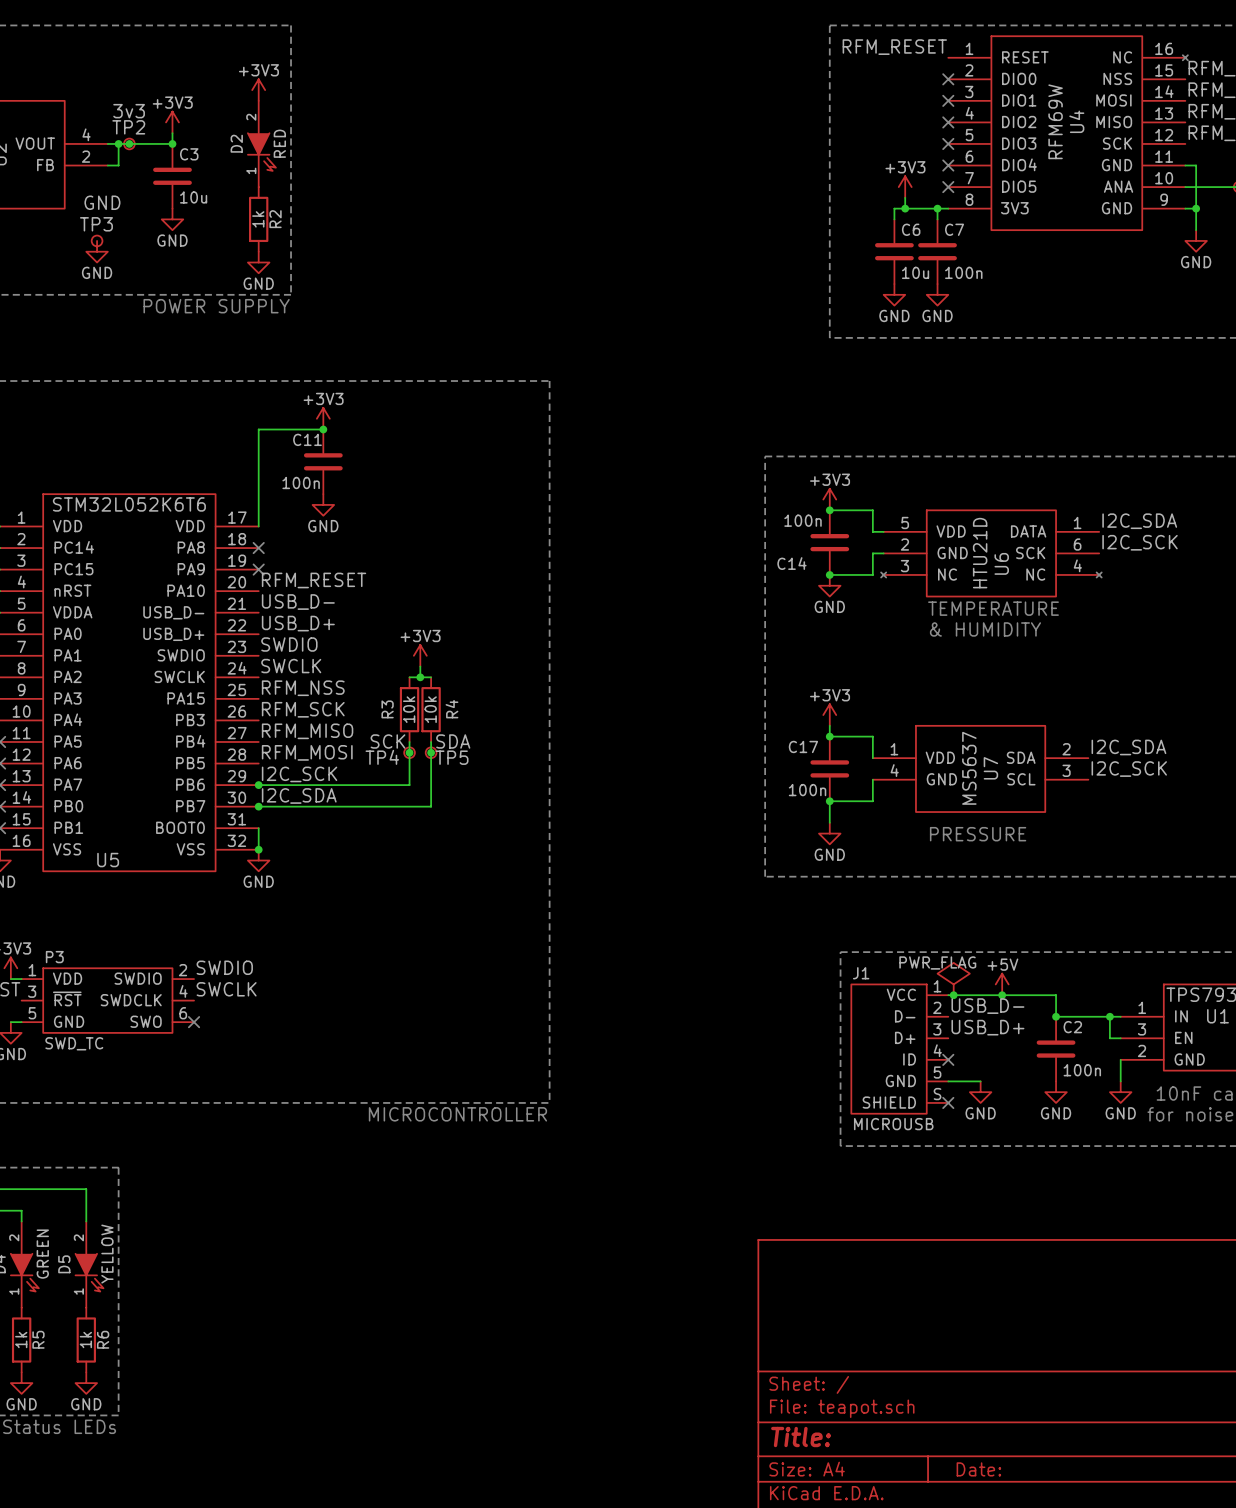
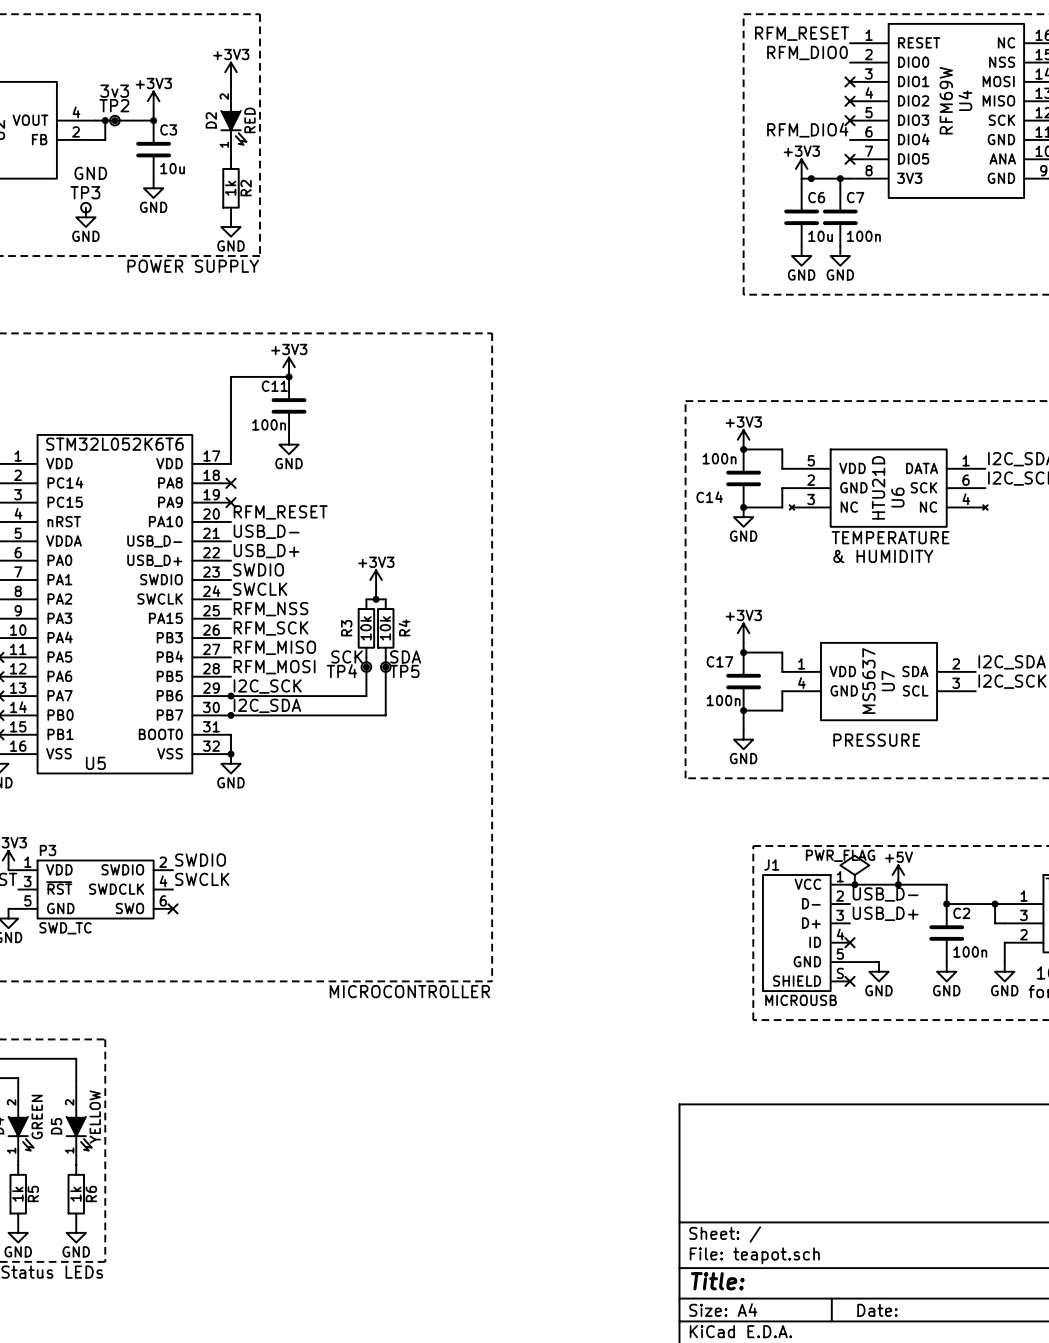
label: none -> RFM_DIO0 (807, 53)
no-connect mark: (948, 79) -> none
label: none -> RFM_DIO4 (807, 130)
no-connect mark: (948, 165) -> none
power symbol position: +3V3 (905, 187) -> +3V3 (801, 168)
wire: (905, 197) (905, 208) -> none

